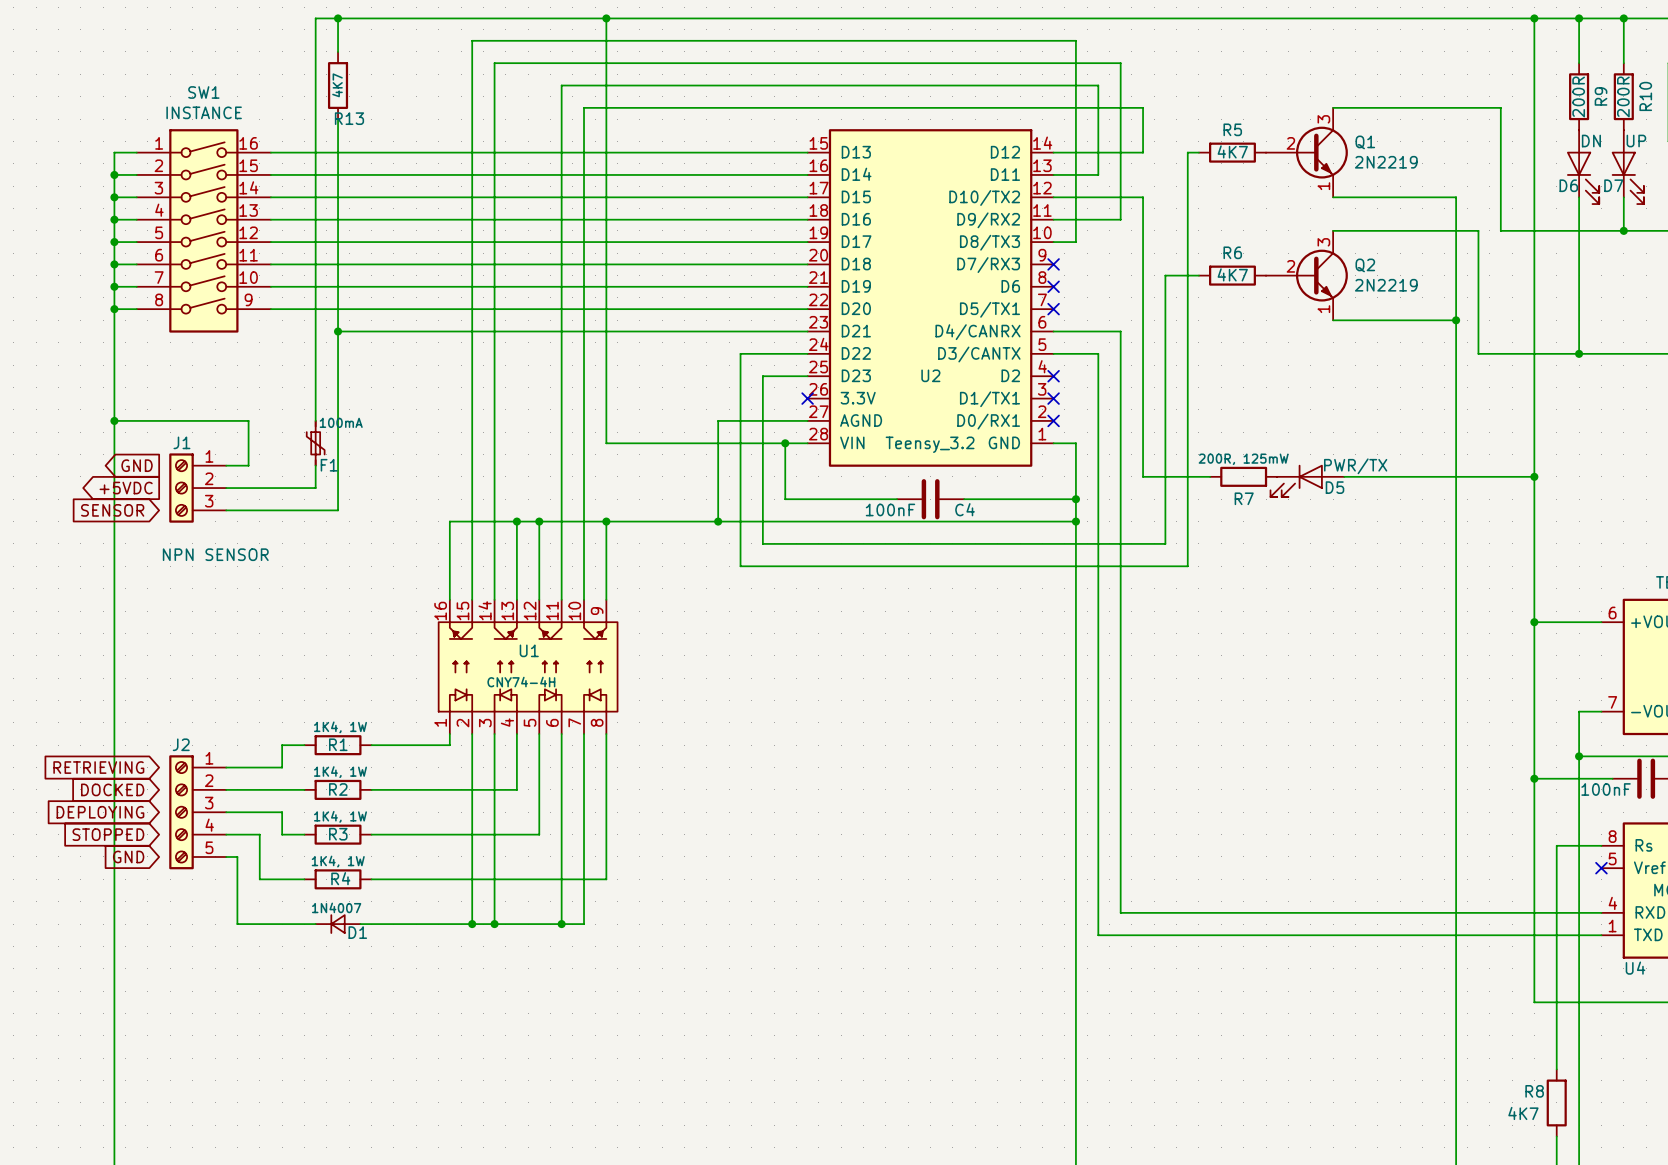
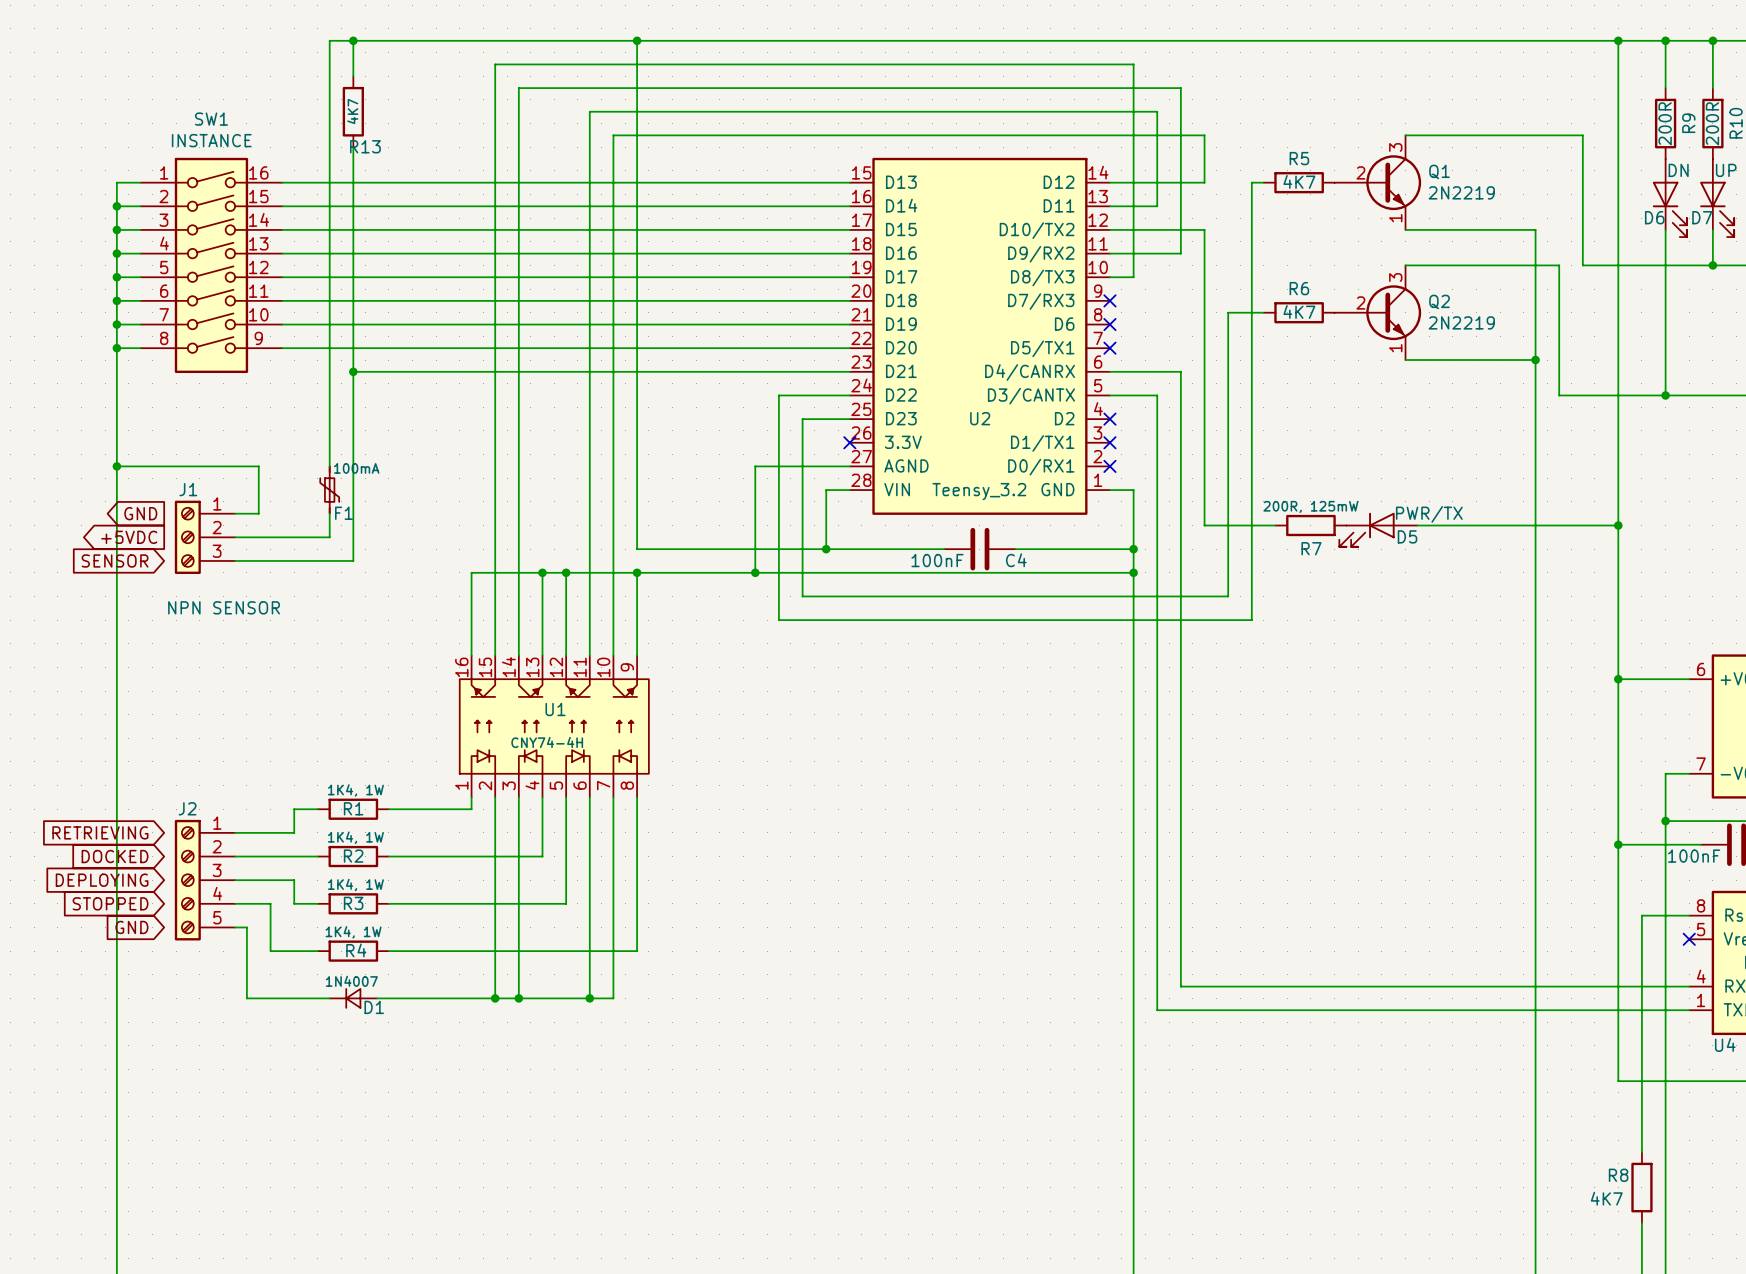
wire: (606, 443) (785, 443) -> (637, 490) (637, 549) (826, 549)
junction: (785, 443) -> none
junction: none -> (826, 549)

